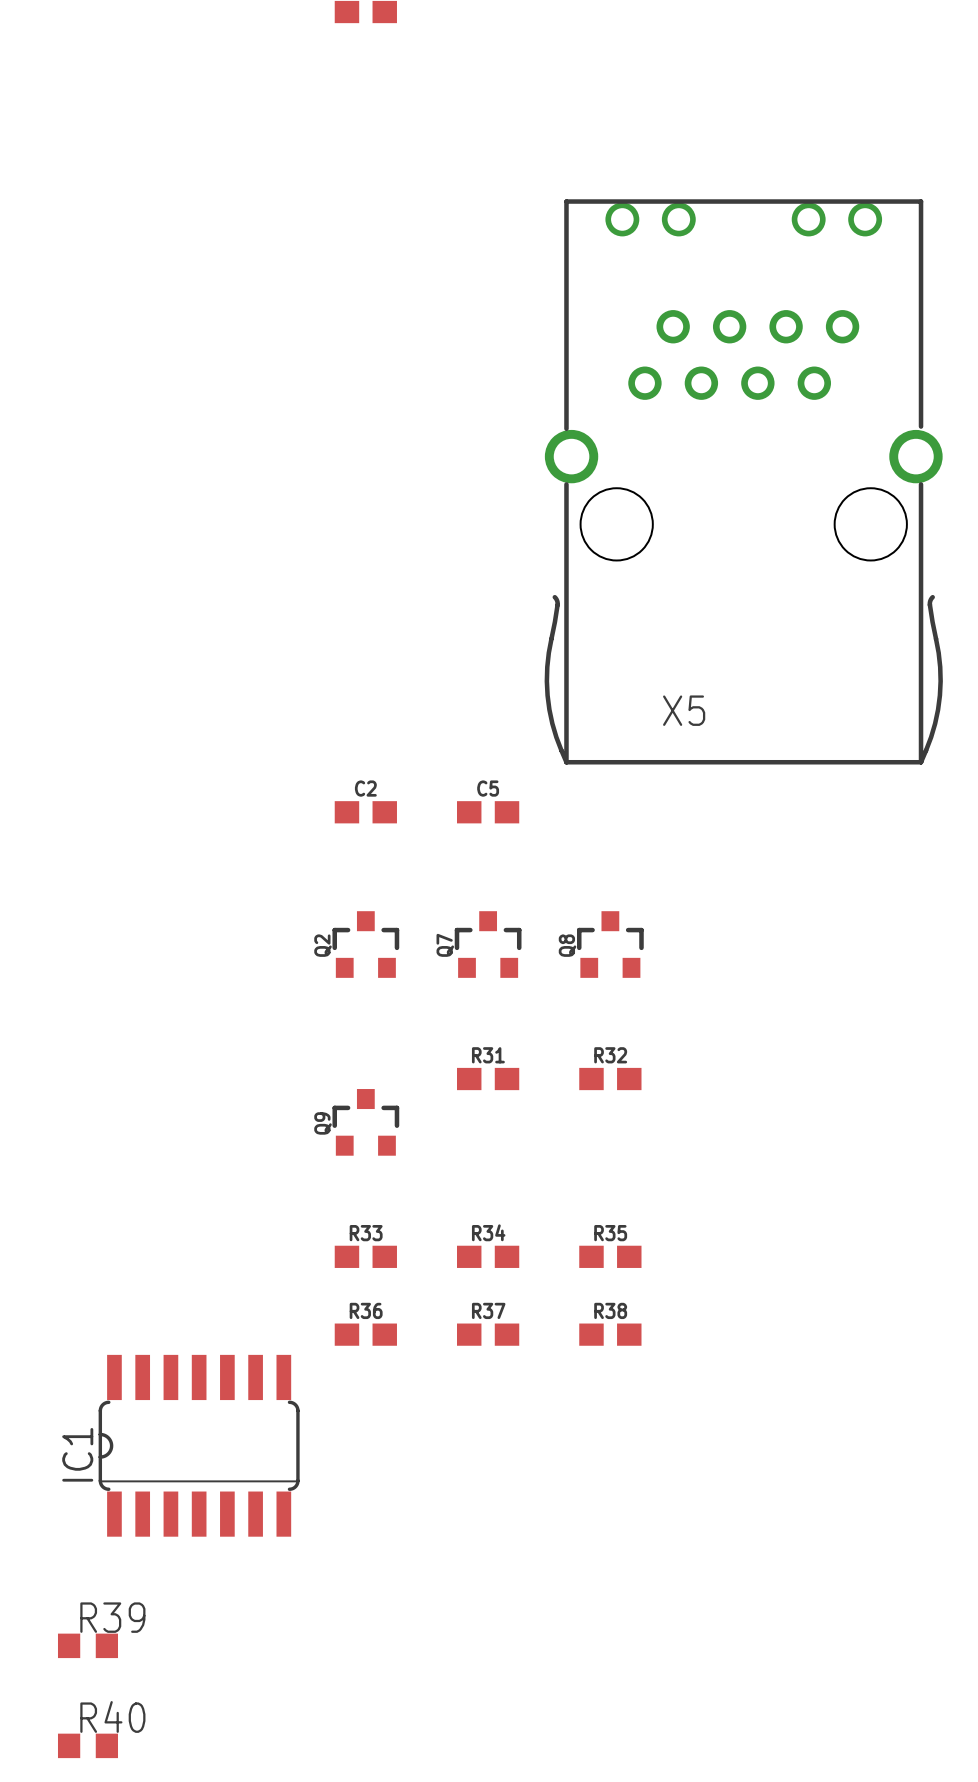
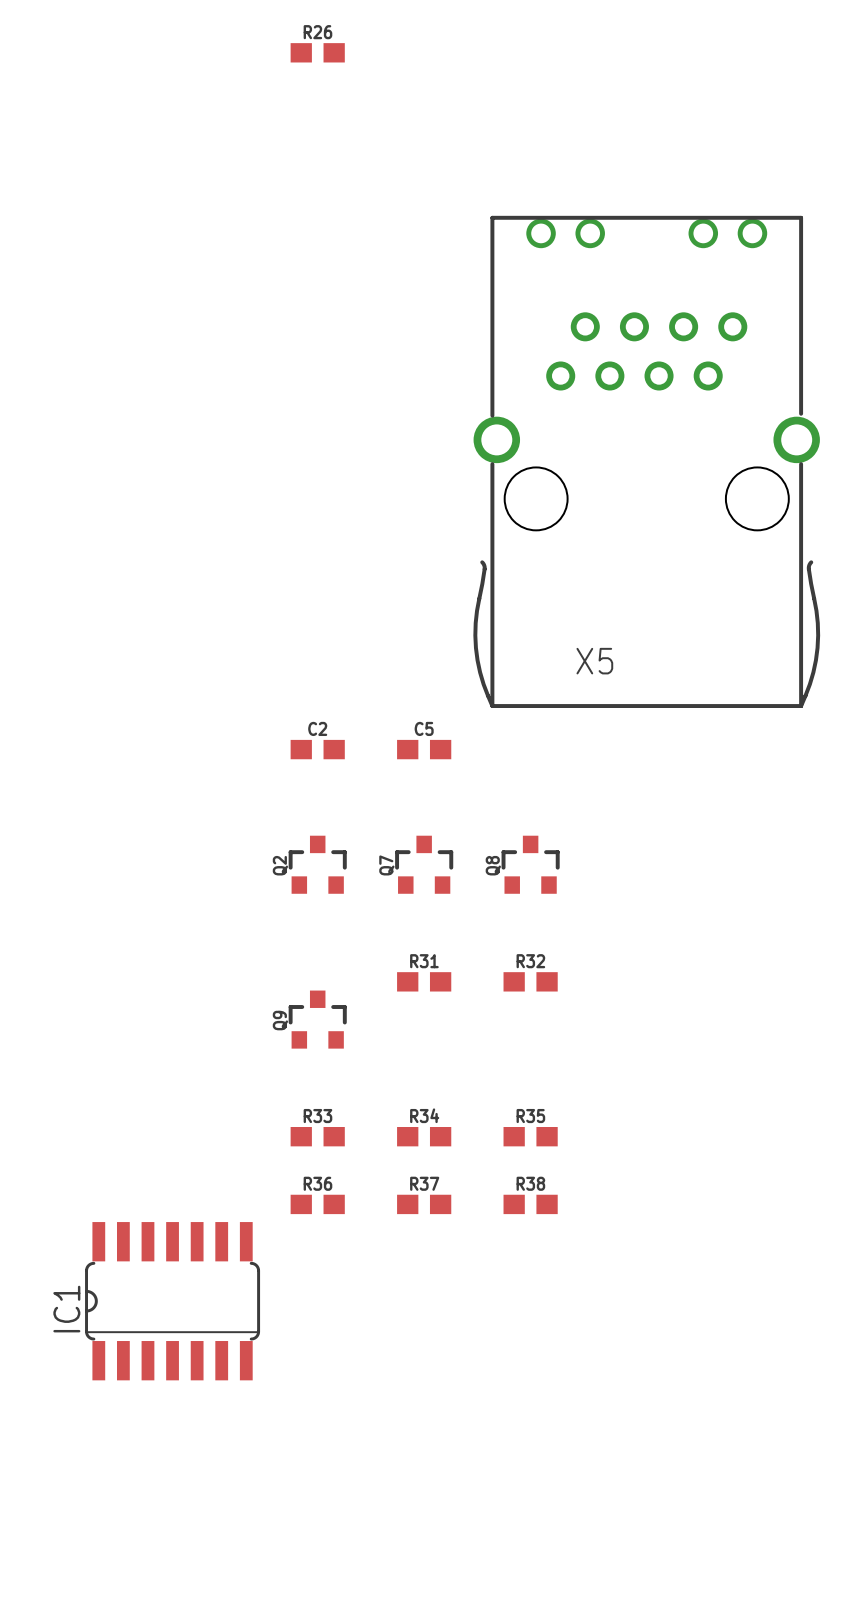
R39: (87, 1645) -> none
R40: (87, 1745) -> none

